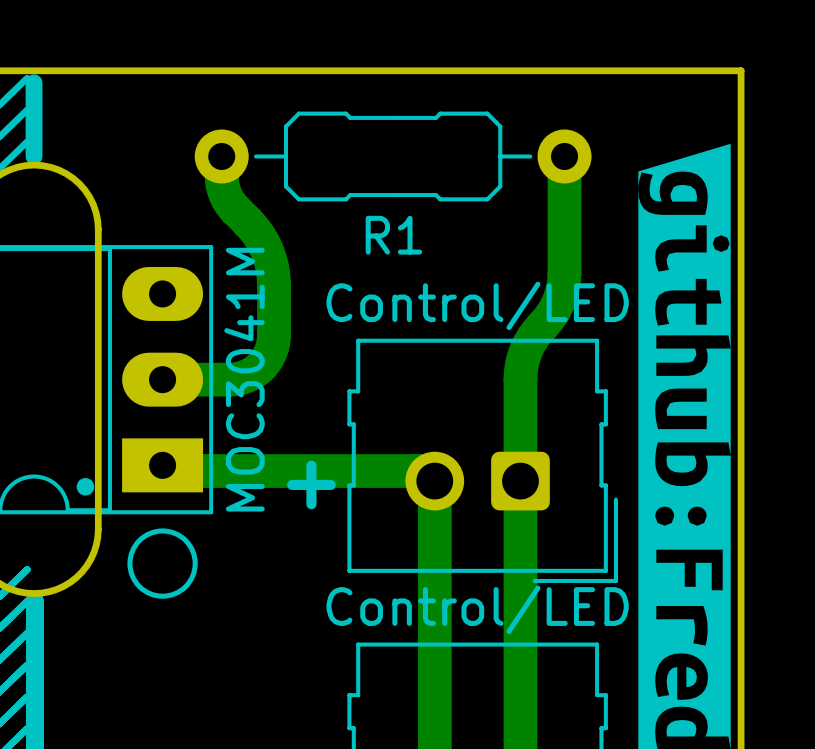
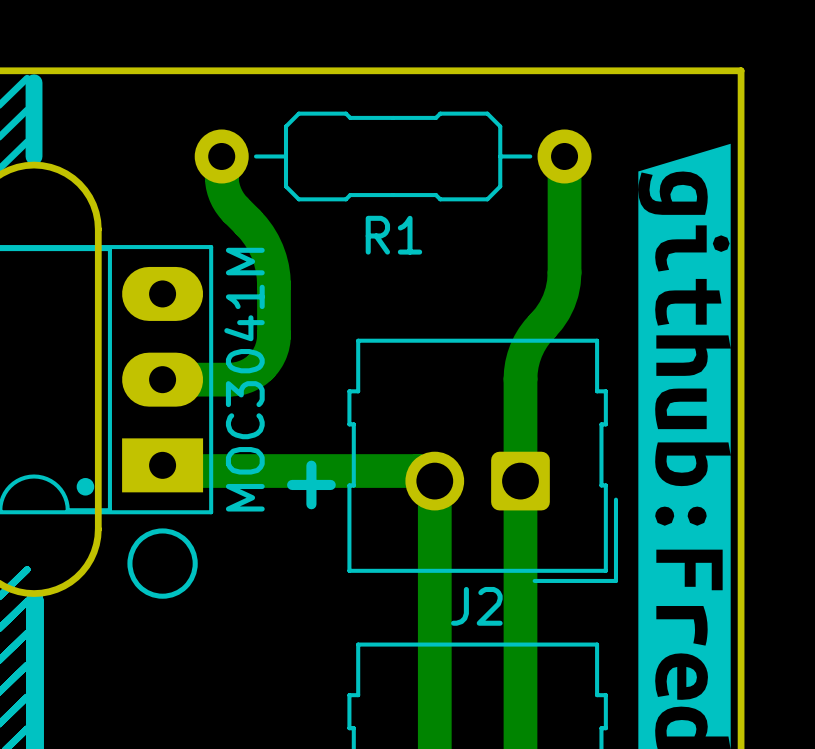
J2 value: Control/LED (477, 305) -> none
J2 name: none -> J2 (476, 606)
part value: Control/LED (477, 609) -> none

